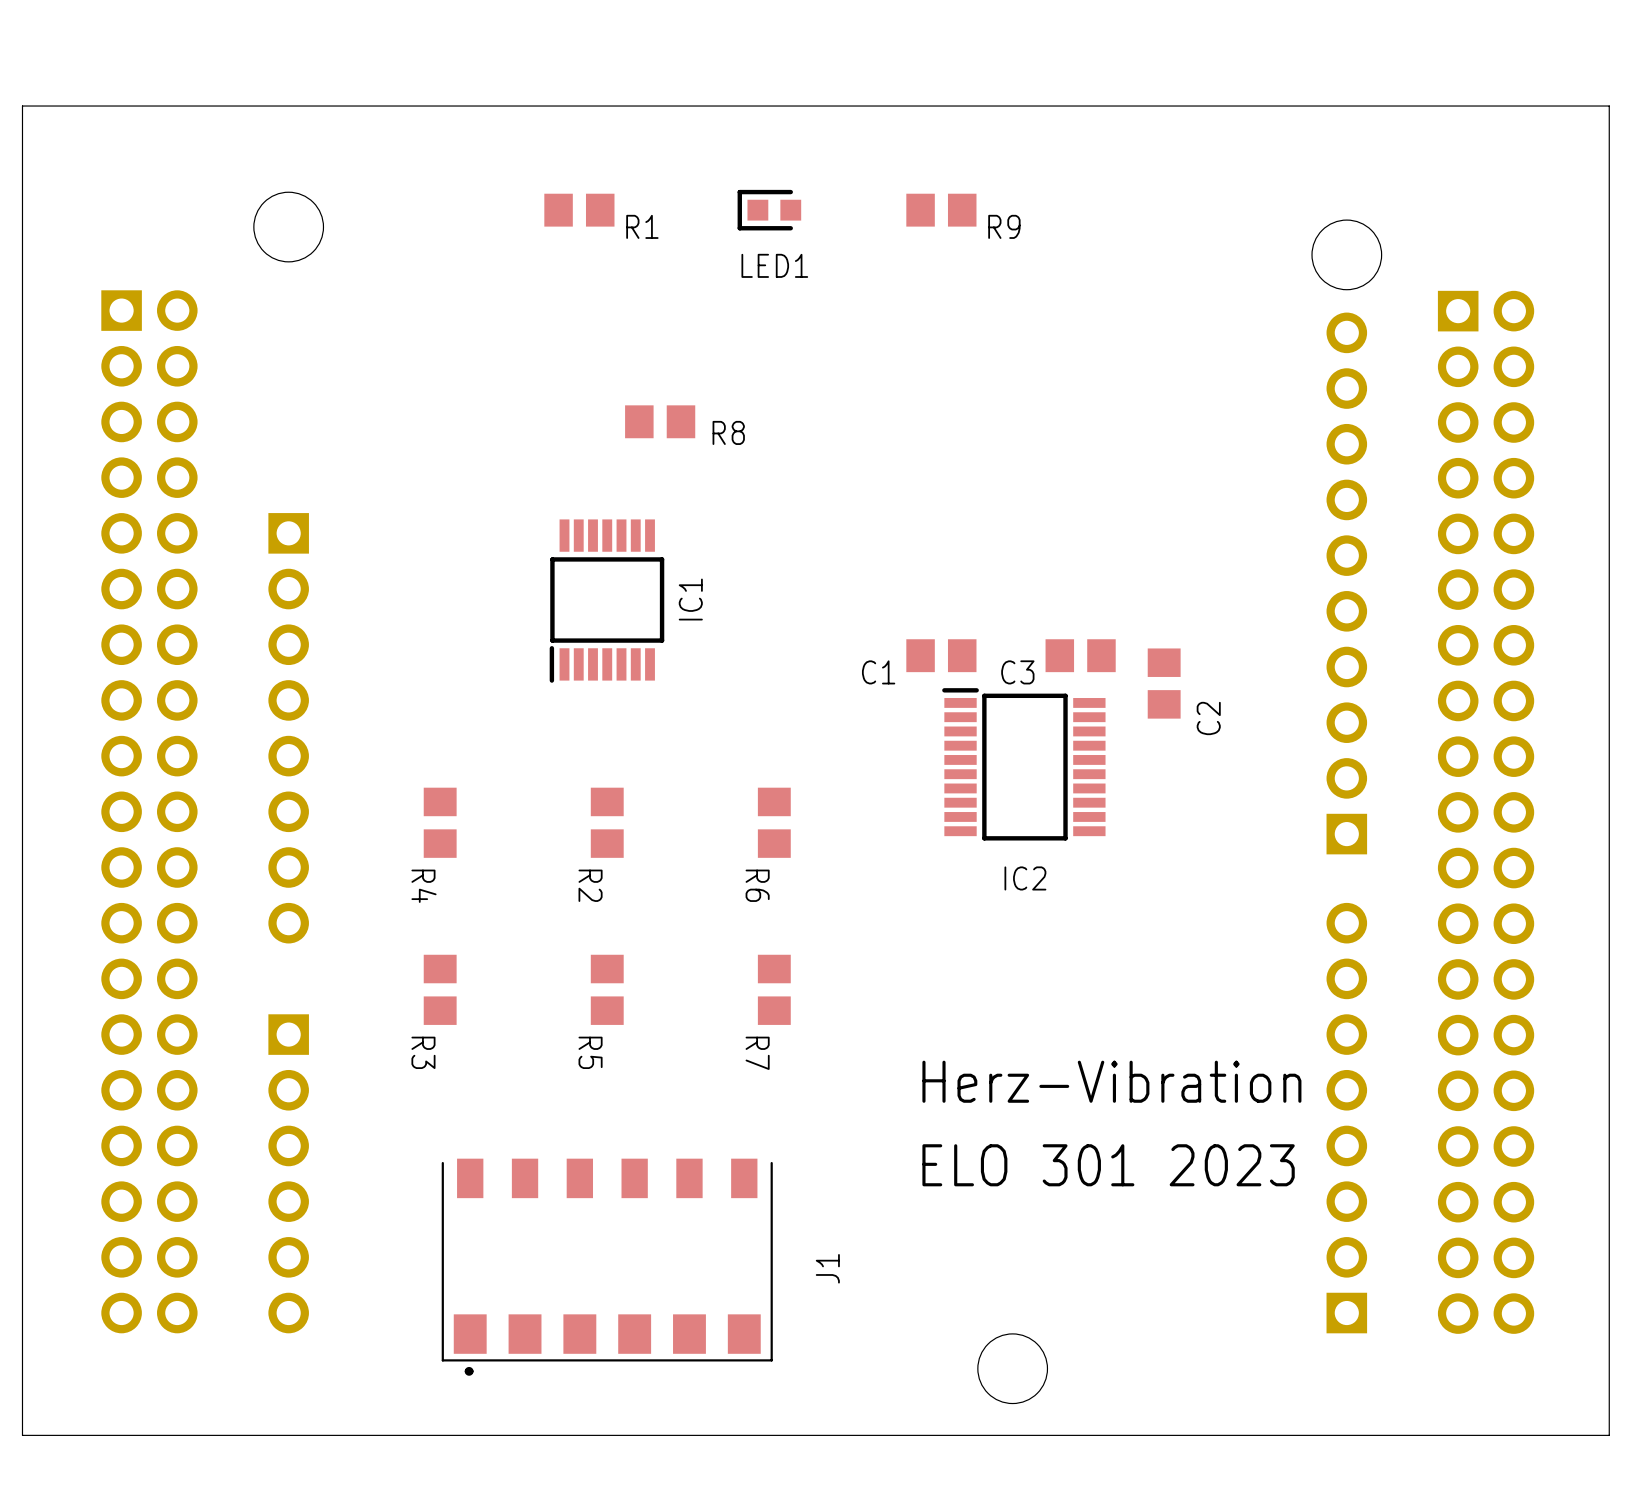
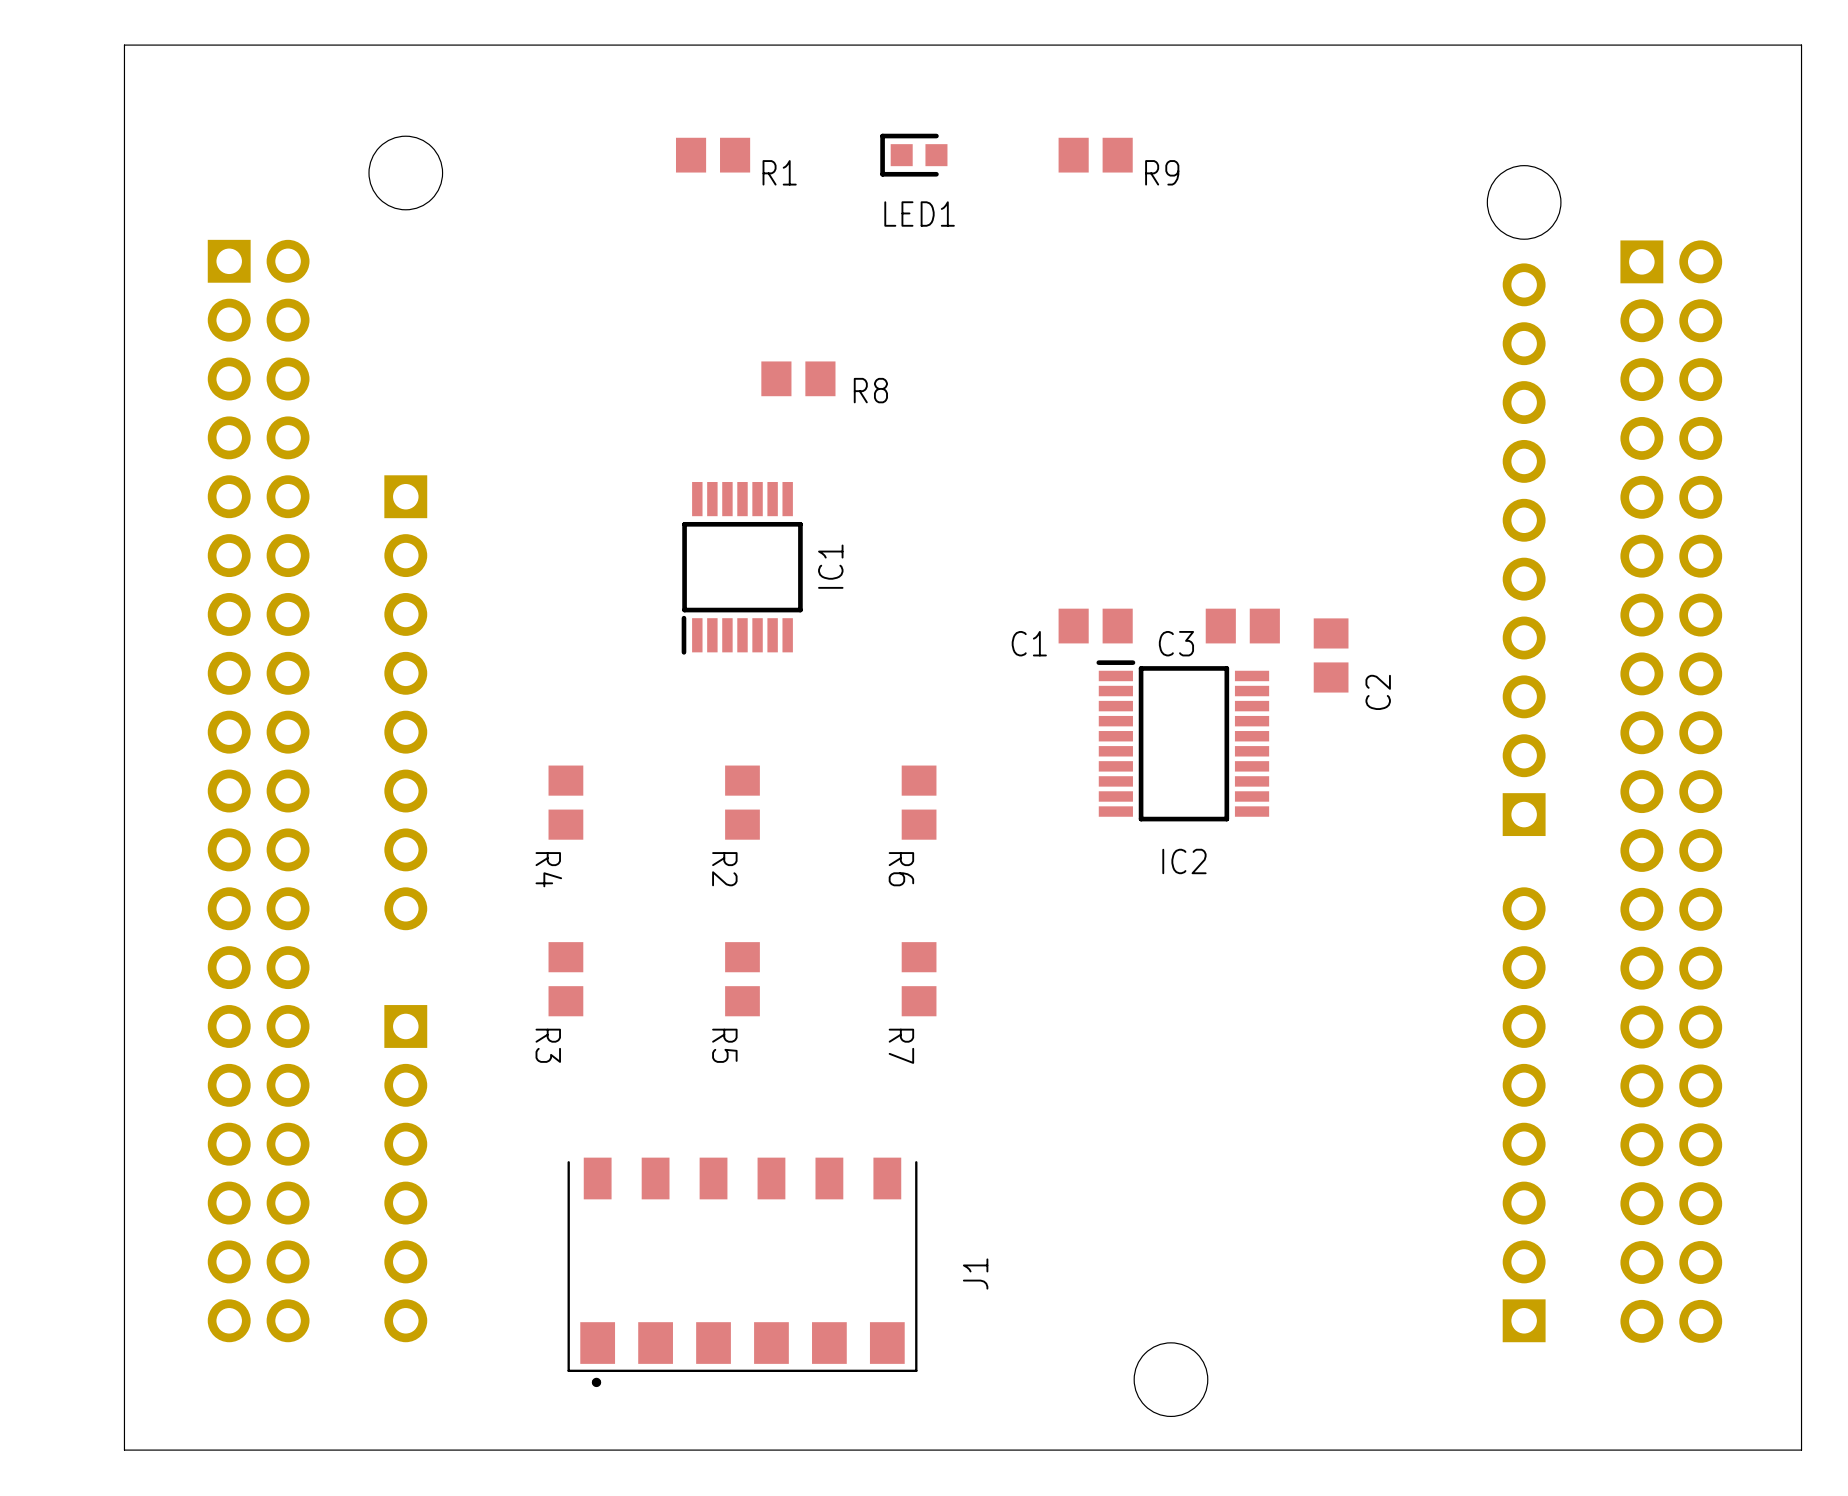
text: Herz-Vibration (1111, 1081) -> none
text: ELO 301 2023 (1108, 1165) -> none

